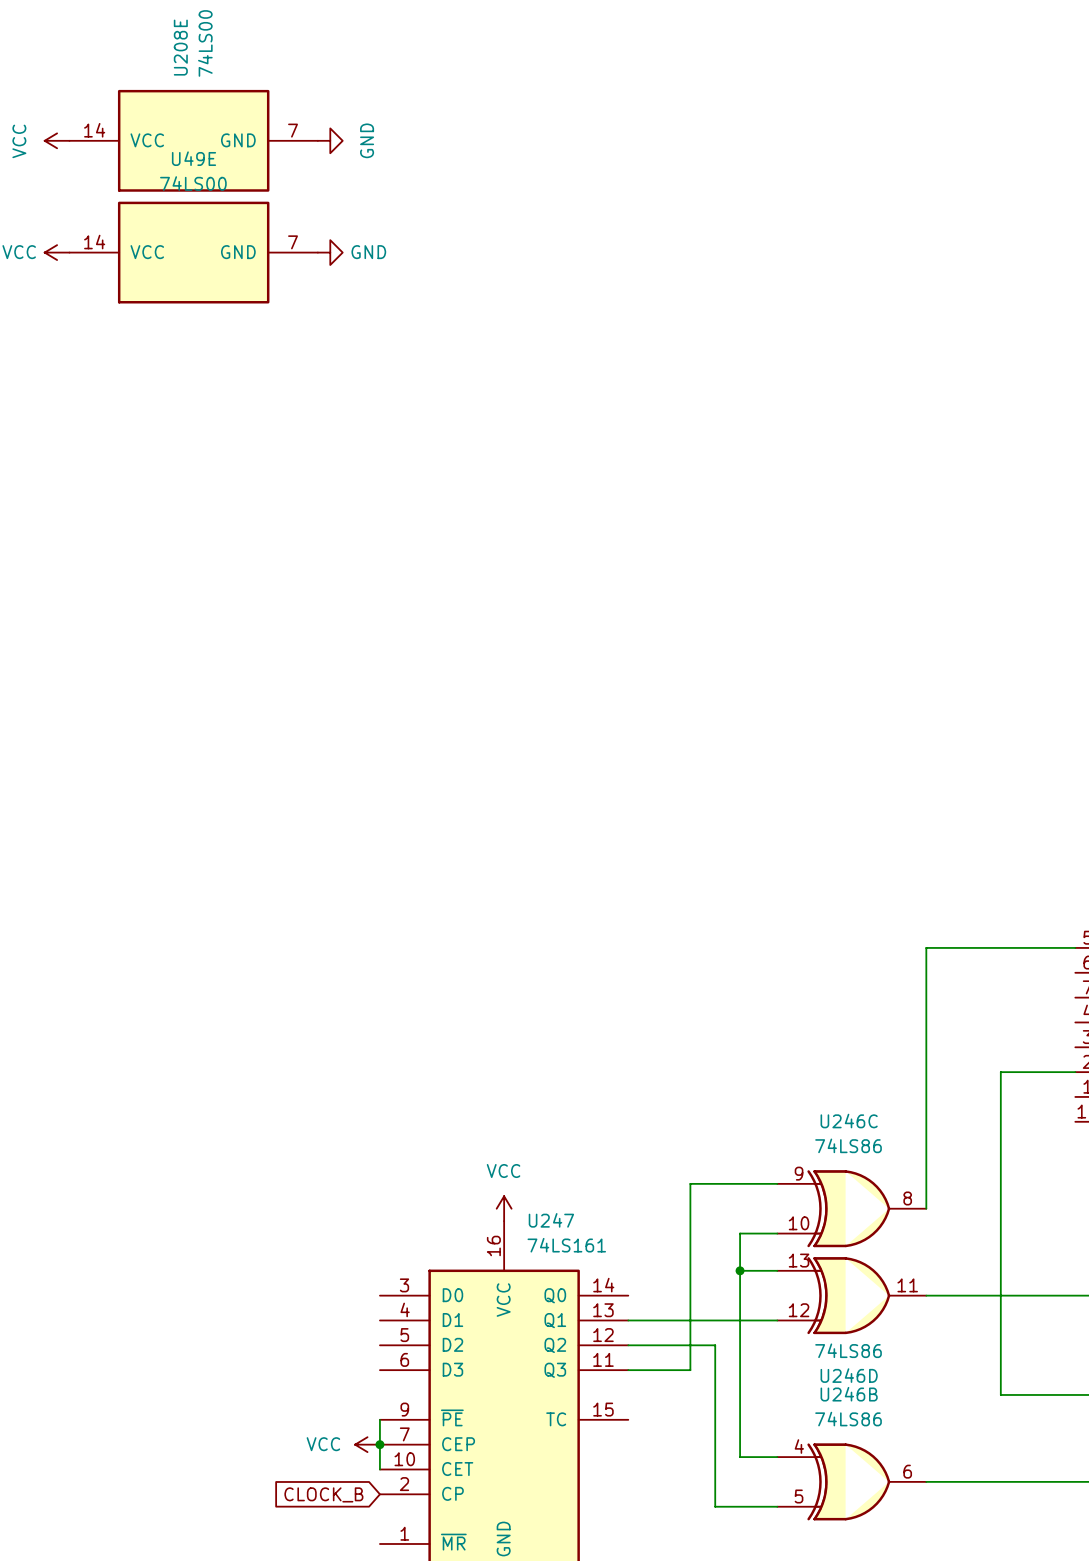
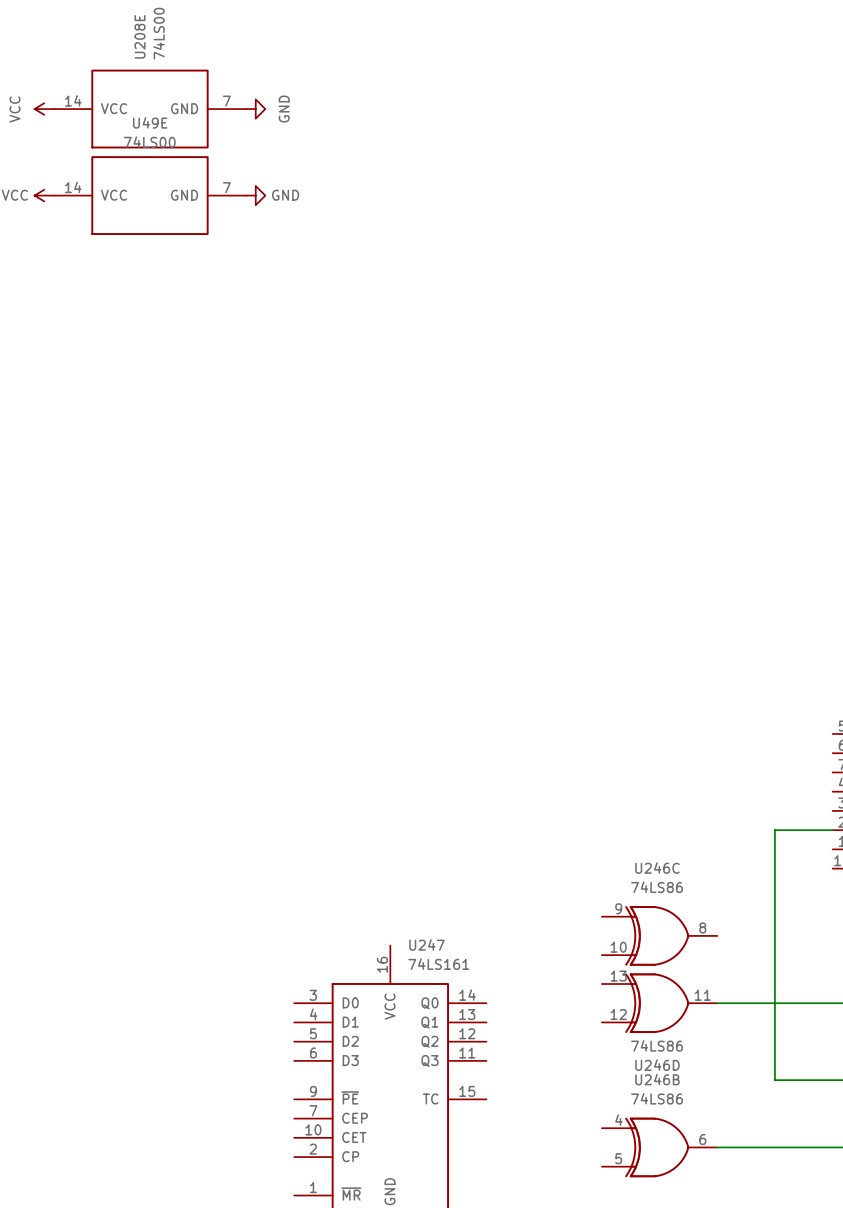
wire: (1075, 947) (926, 947) (926, 1208) -> none
wire: (777, 1183) (690, 1183) (690, 1370) (628, 1370) -> none
power symbol: VCC (504, 1208) -> none
wire: (777, 1233) (740, 1233) (740, 1457) (777, 1457) -> none
wire: (740, 1270) (777, 1270) -> none
junction: (740, 1270) -> none
wire: (628, 1320) (777, 1320) -> none
wire: (628, 1345) (715, 1345) (715, 1506) (777, 1506) -> none
wire: (379, 1419) (379, 1469) -> none
power symbol: VCC (367, 1444) -> none
junction: (379, 1444) -> none
global label: CLOCK_B (323, 1494) -> none

